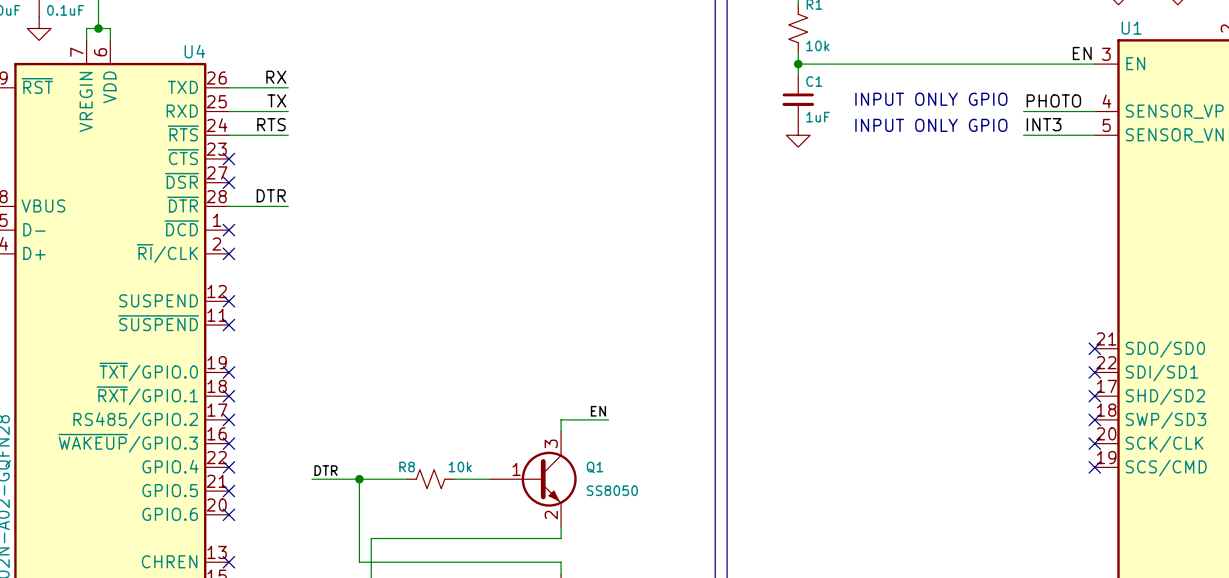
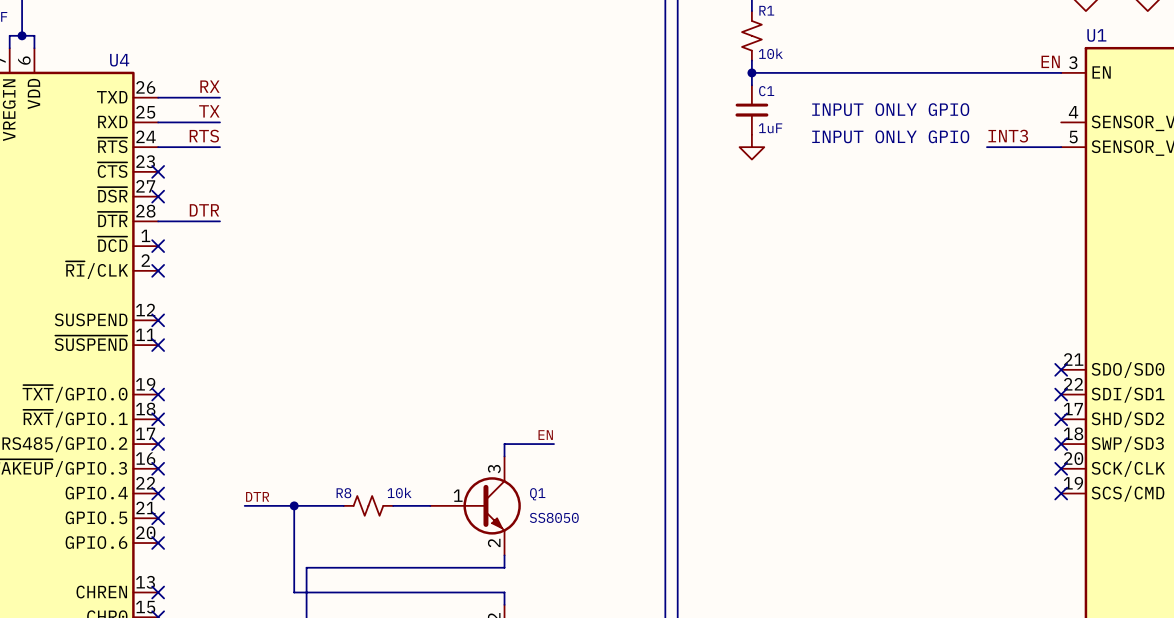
label: PHOTO (1053, 100) -> none
wire: (1023, 111) (1094, 111) -> none

